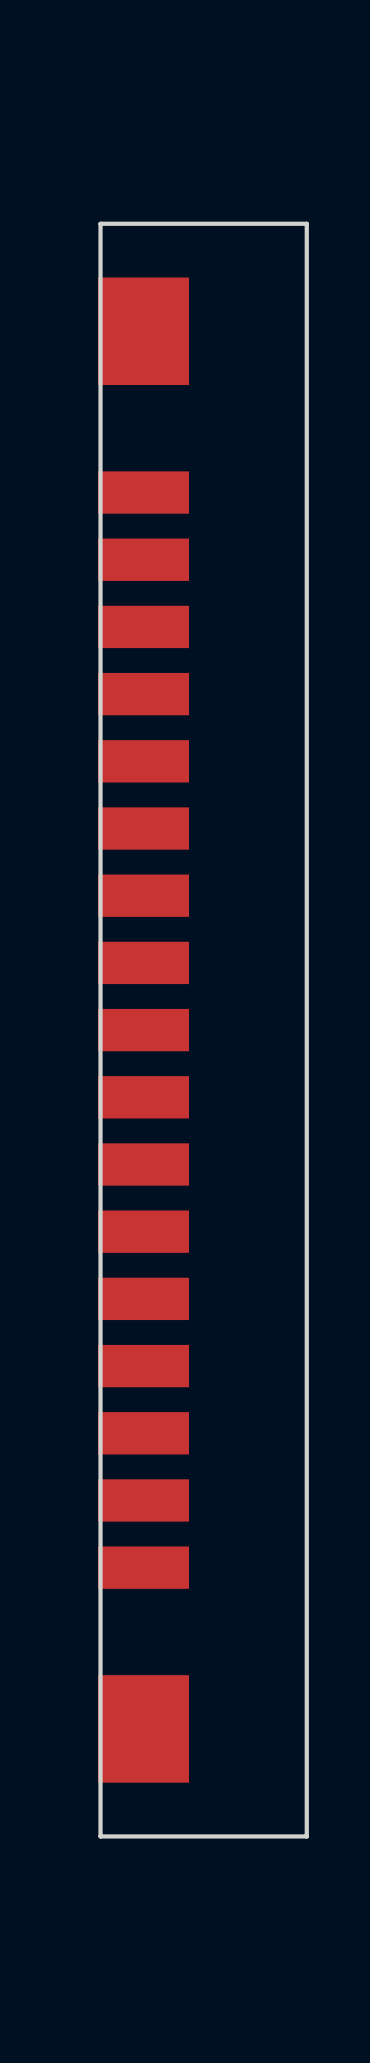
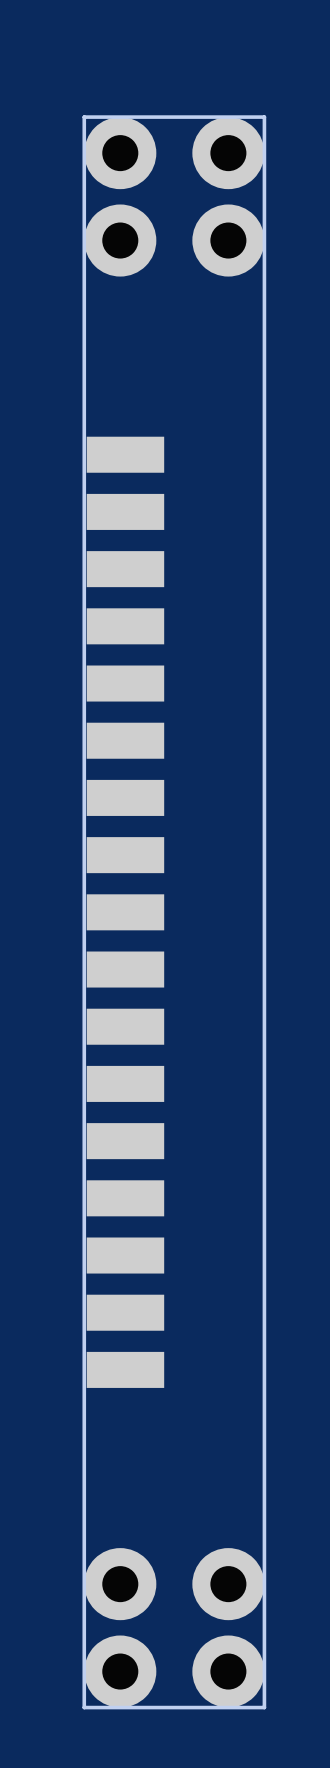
part: none -> (174, 153)
board edge: (306, 223) (100, 223) (100, 1836) (306, 1836) -> (264, 225) (264, 117) (84, 117) (84, 1707) (264, 1707) (264, 1598)
part: none -> (174, 240)
part: (143, 331) -> none
part: (143, 1728) -> none
part: none -> (174, 1584)
part: none -> (174, 1671)

